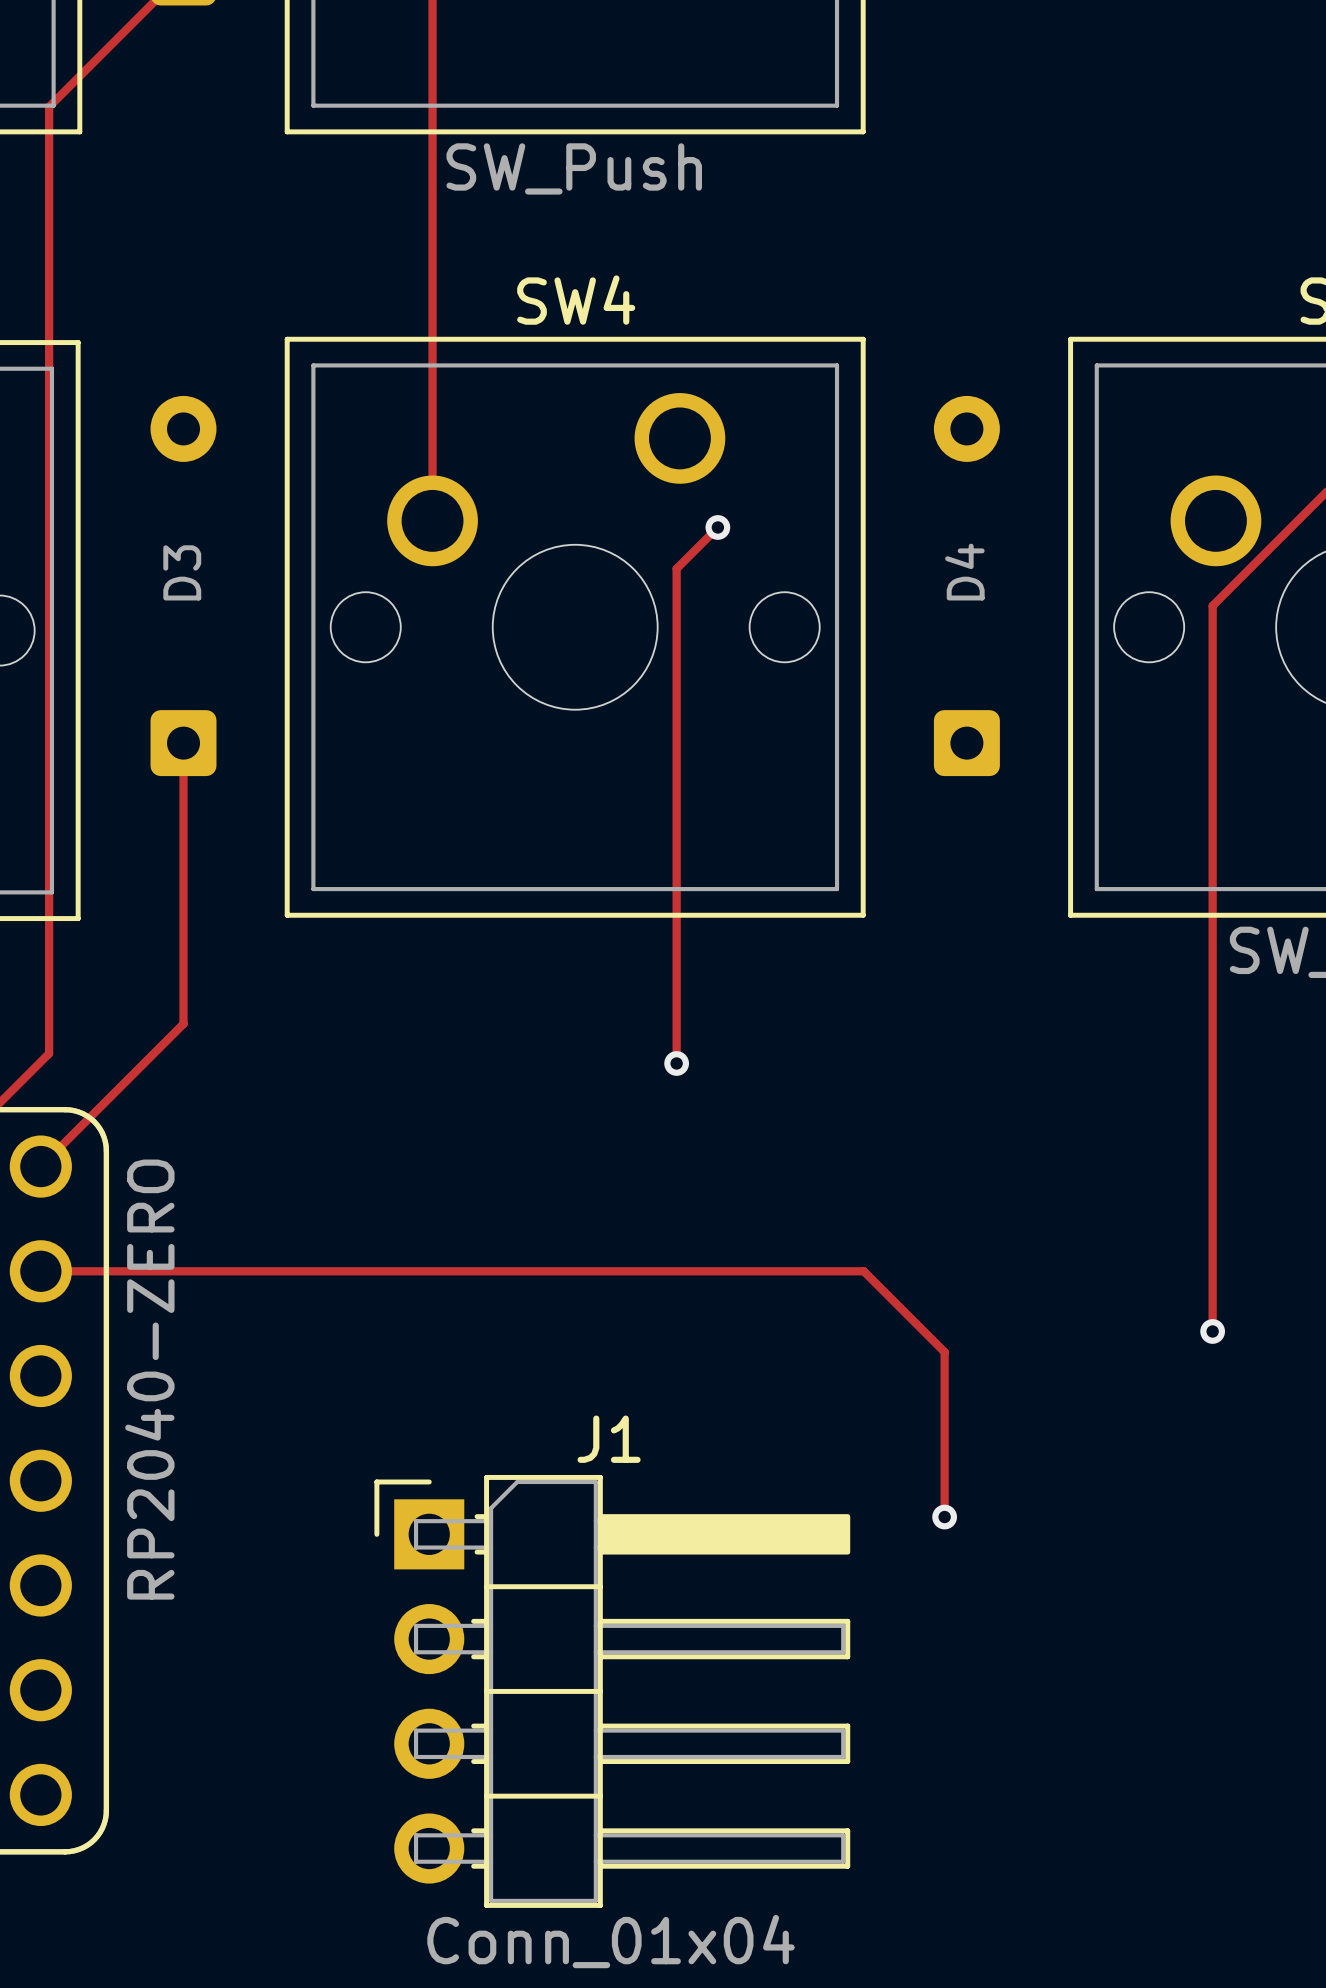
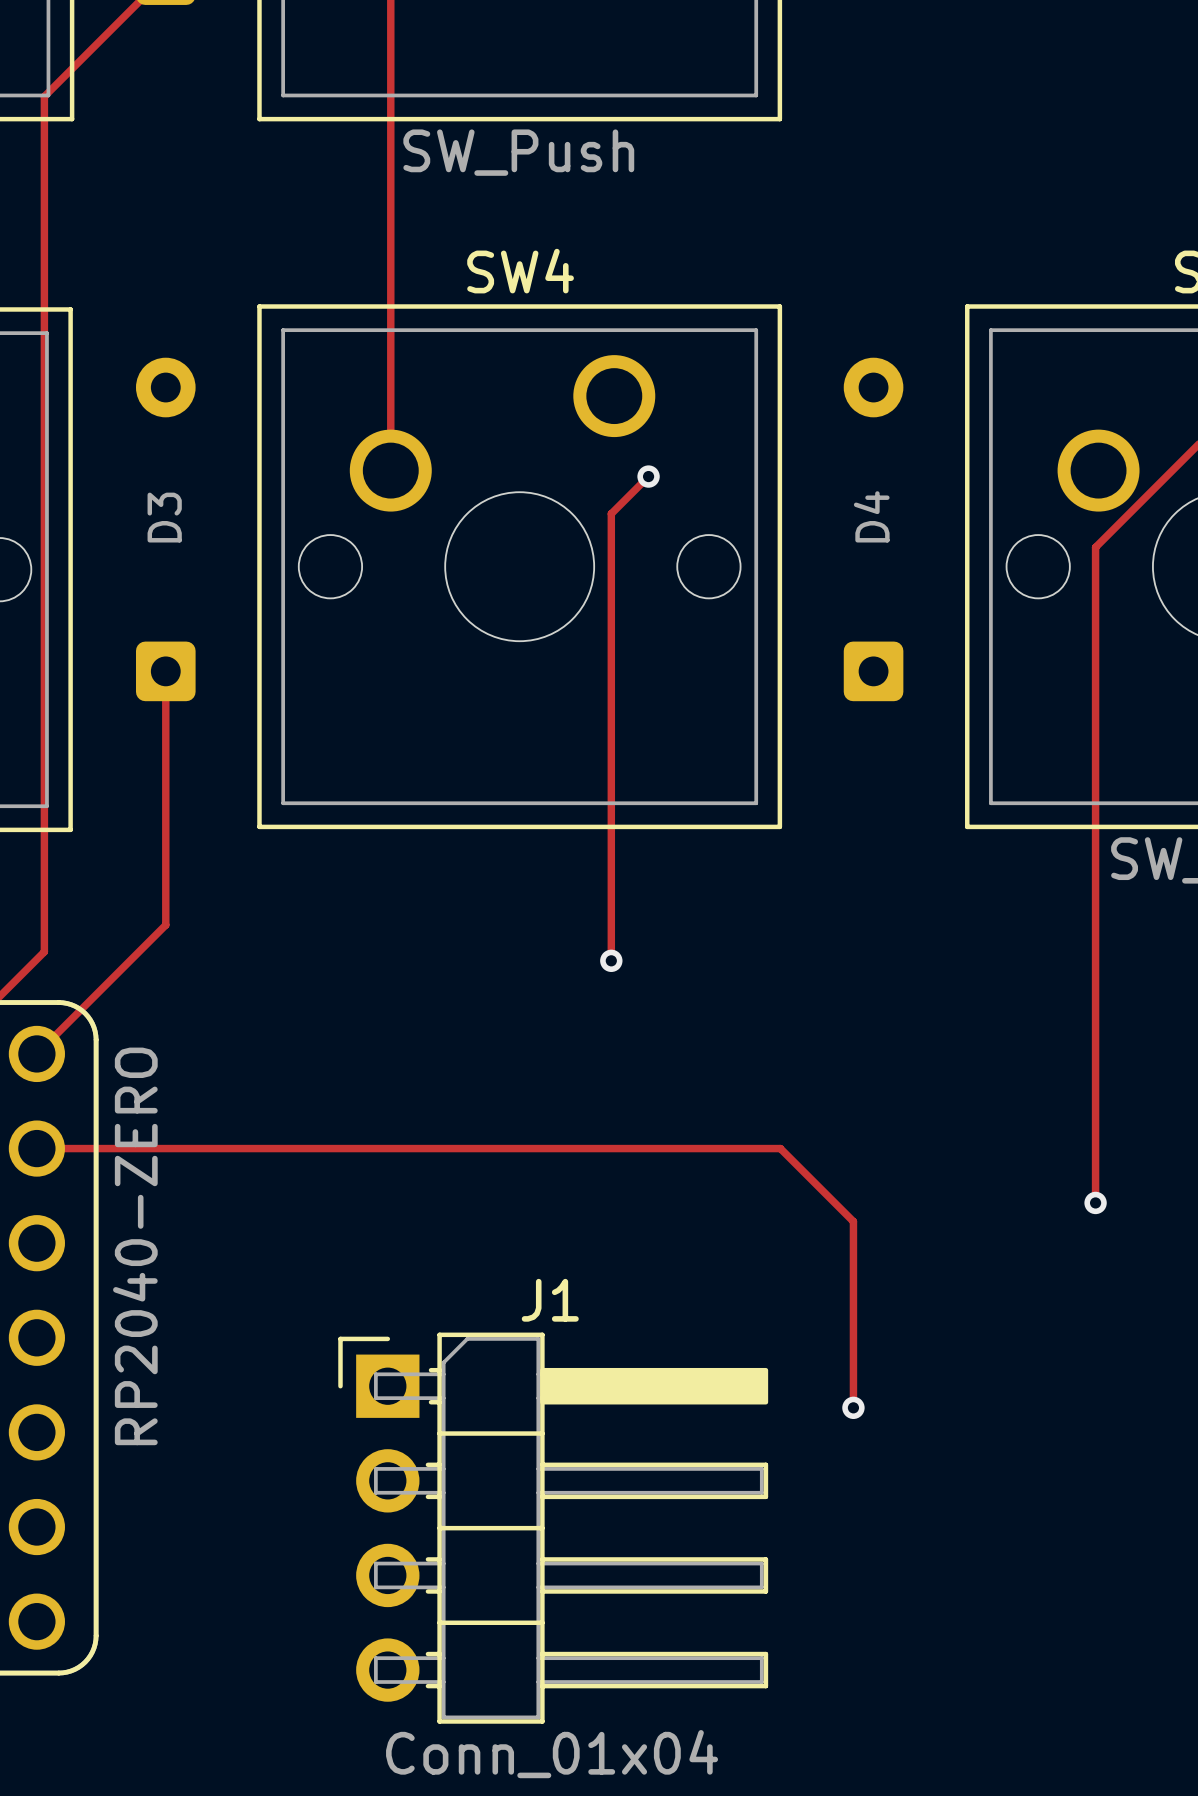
track: none -> (853, 1370) (853, 1407)
via position: (944, 1517) -> (853, 1407)

